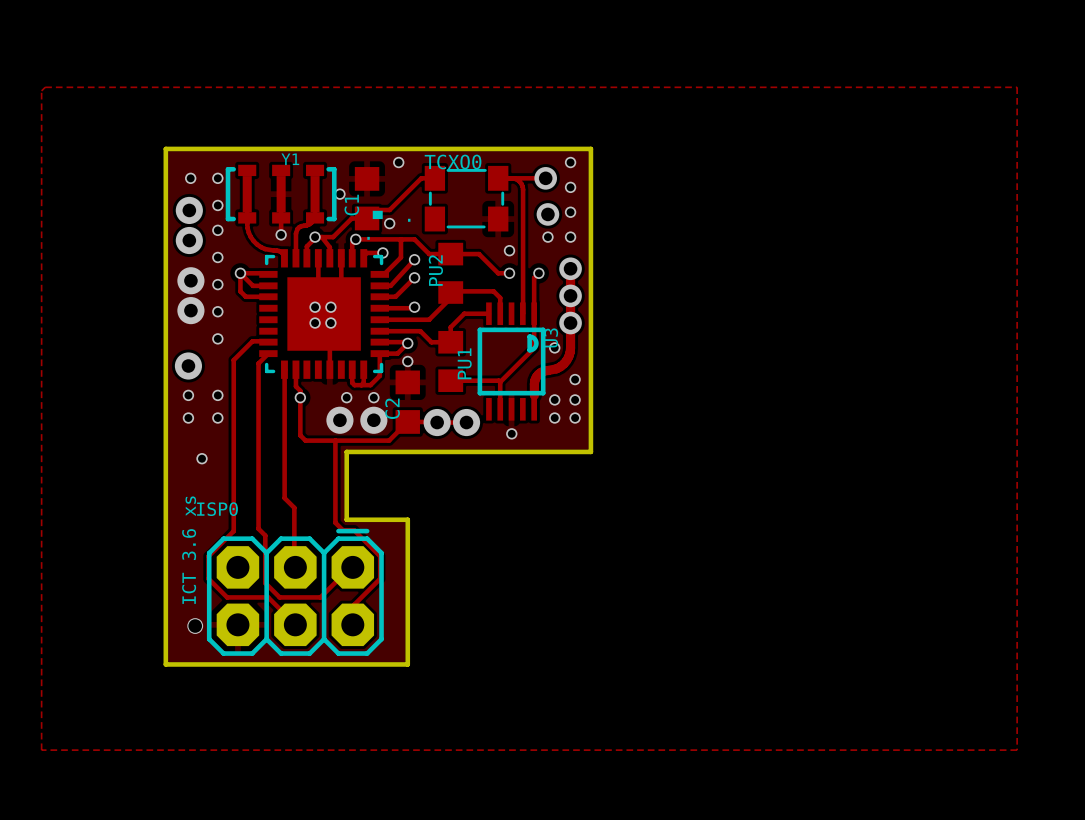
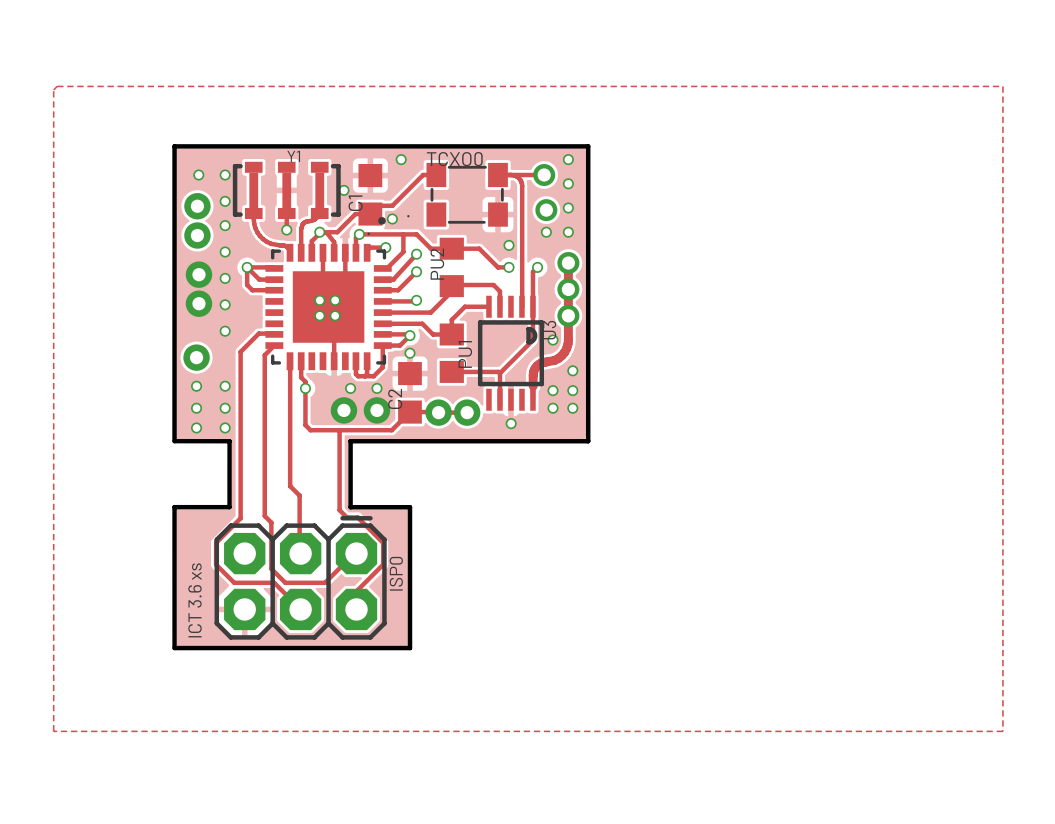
board edge: (165, 148) (165, 664) -> (174, 146) (174, 441) (229, 441) (229, 507) (174, 507) (174, 648)
via: none -> (196, 427)
via: none -> (225, 427)
via: (202, 458) -> none
ISP0 name rotation: 0° (217, 509) -> 90° counterclockwise (396, 573)
ISP0 name position: ISP0 (217, 509) -> ISP0 (396, 573)
text position: ICT 3.6 xs (189, 550) -> ICT 3.6 xs (195, 600)
via: (195, 626) -> none

